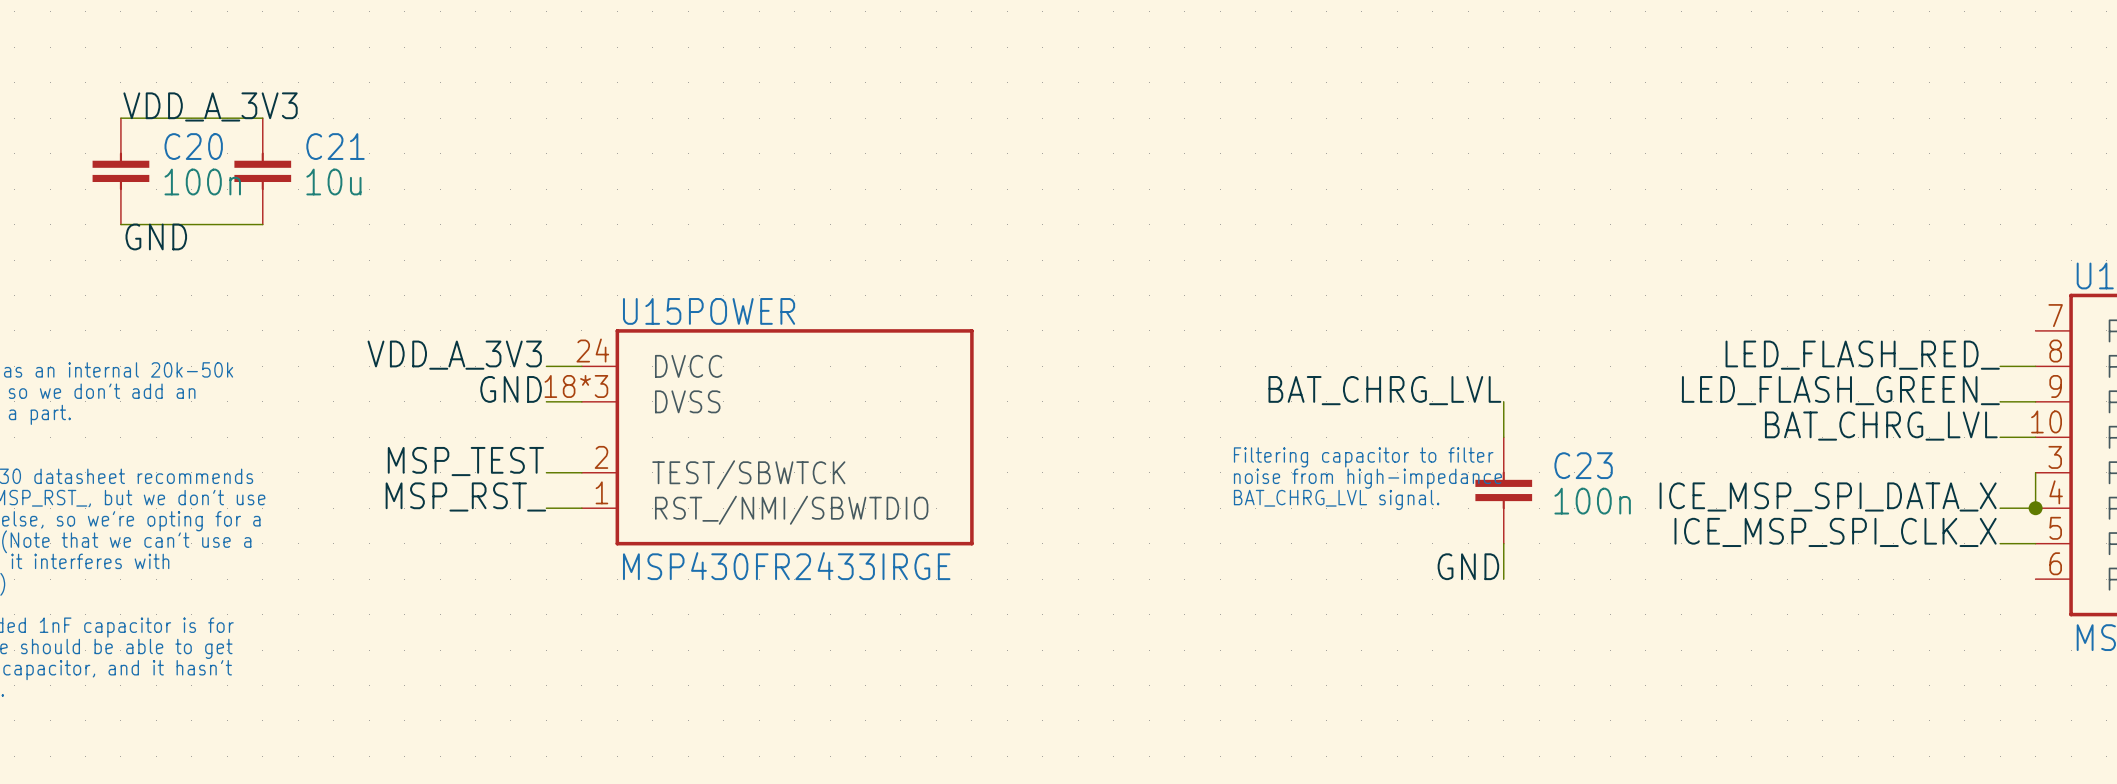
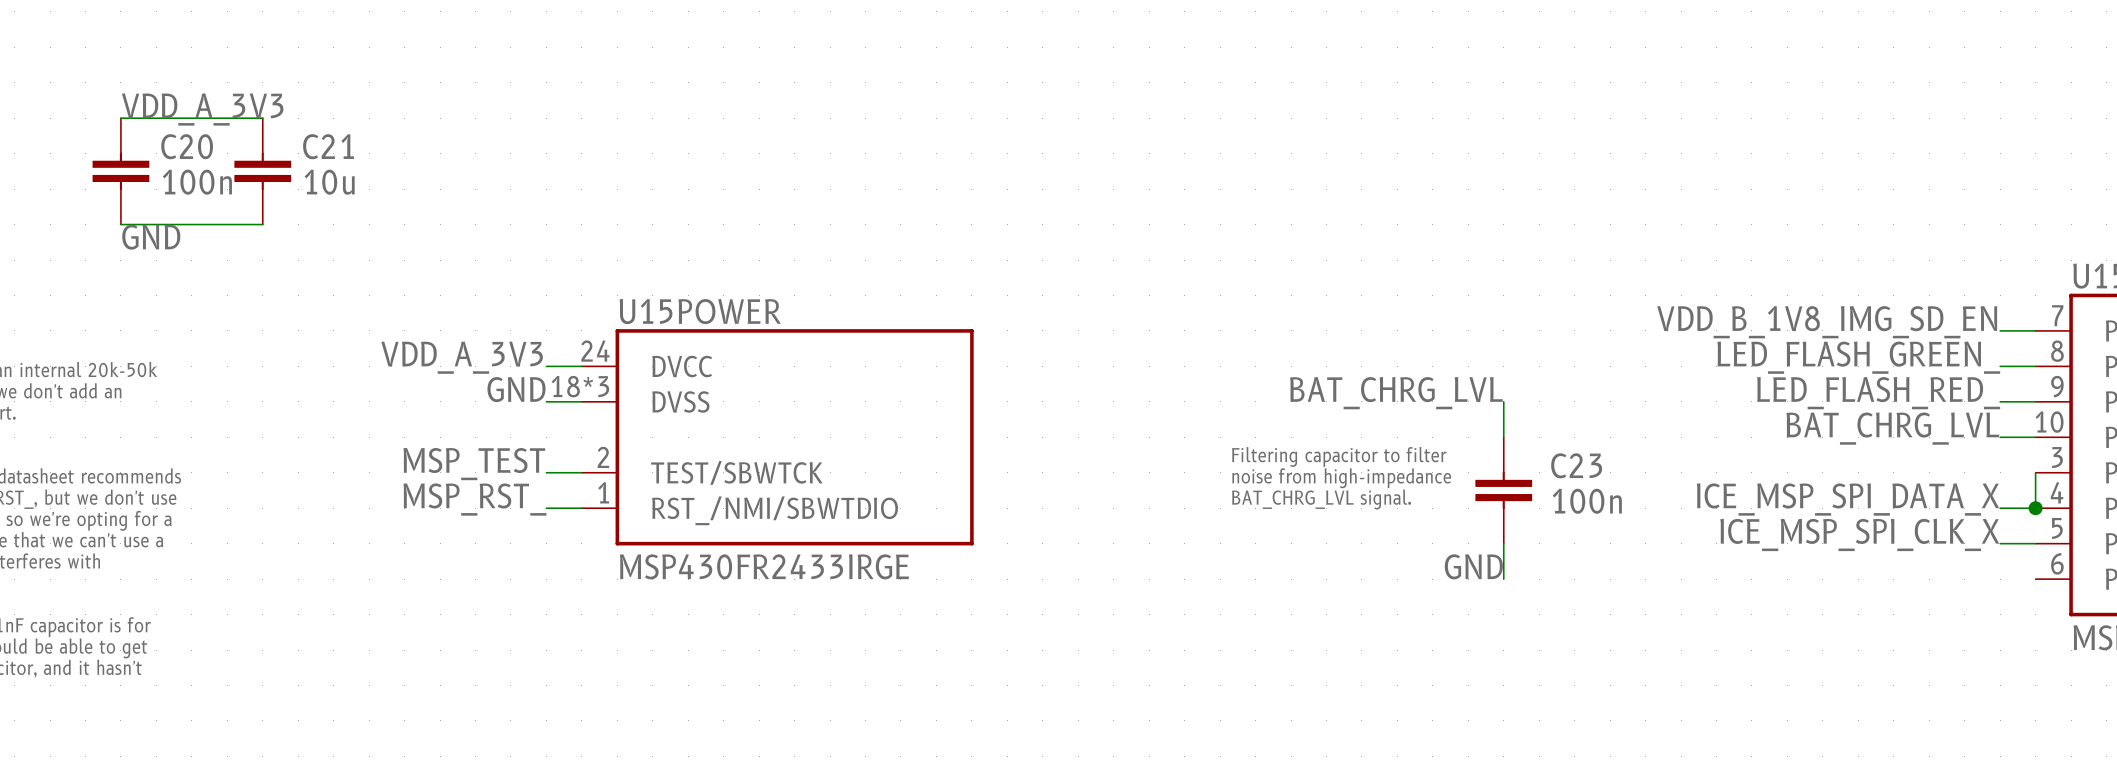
label: none -> VDD_B_1V8_IMG_SD_EN (1827, 322)
wire: none -> (2000, 330) (2035, 330)
label: LED_FLASH_RED_ (1862, 355) -> LED_FLASH_GREEN_ (1858, 357)
label: LED_FLASH_GREEN_ (1840, 390) -> LED_FLASH_RED_ (1878, 393)

